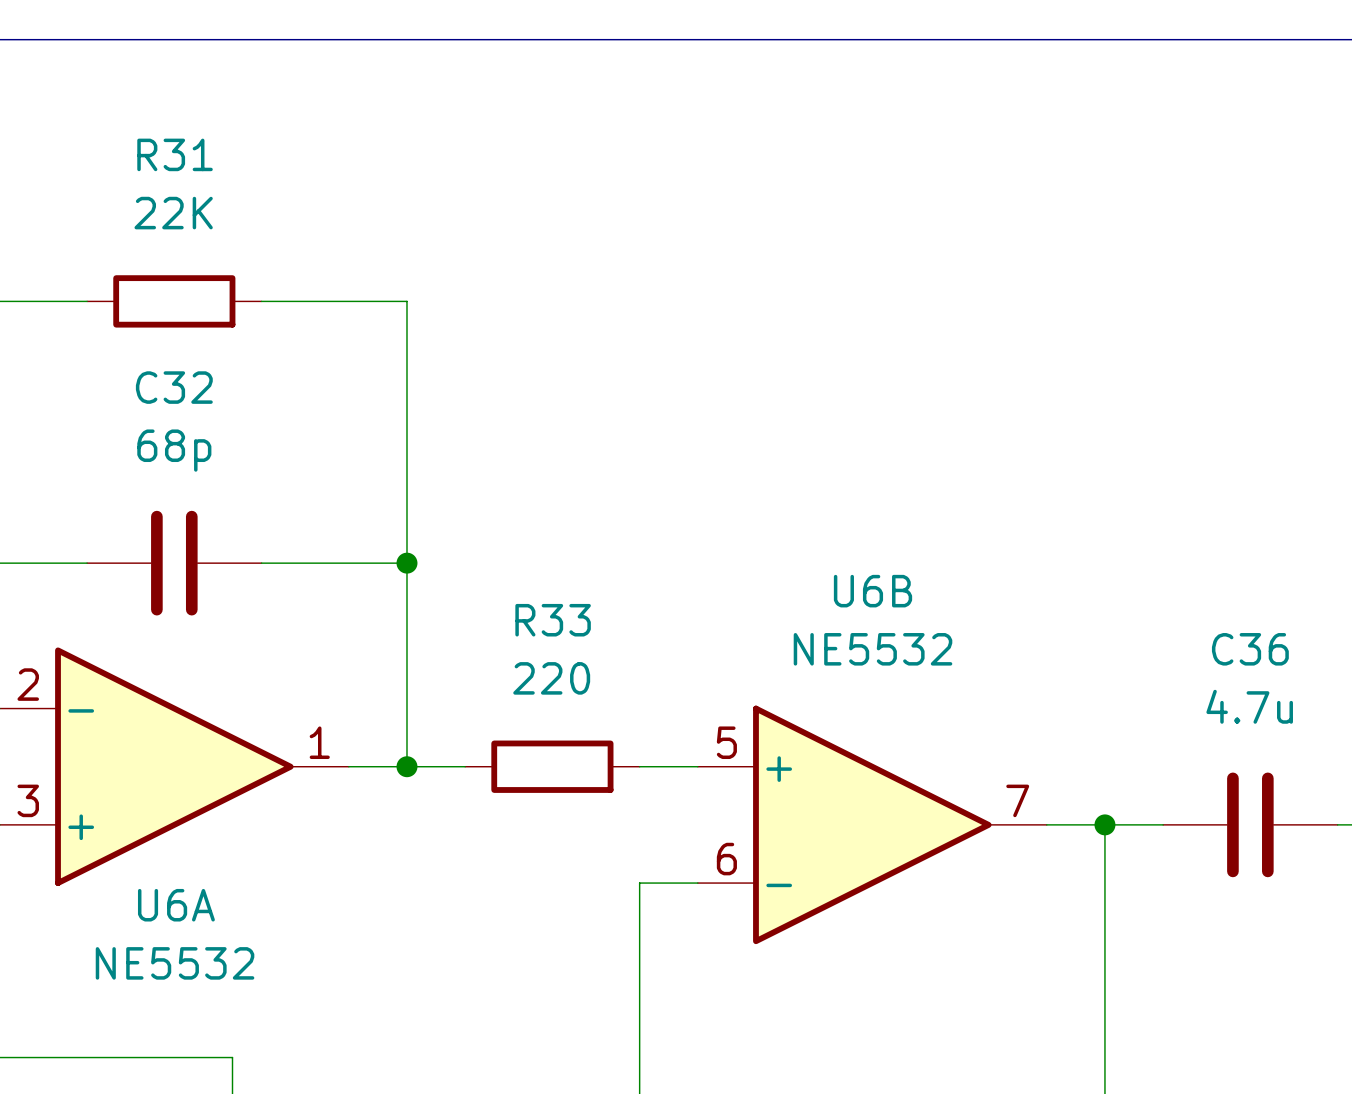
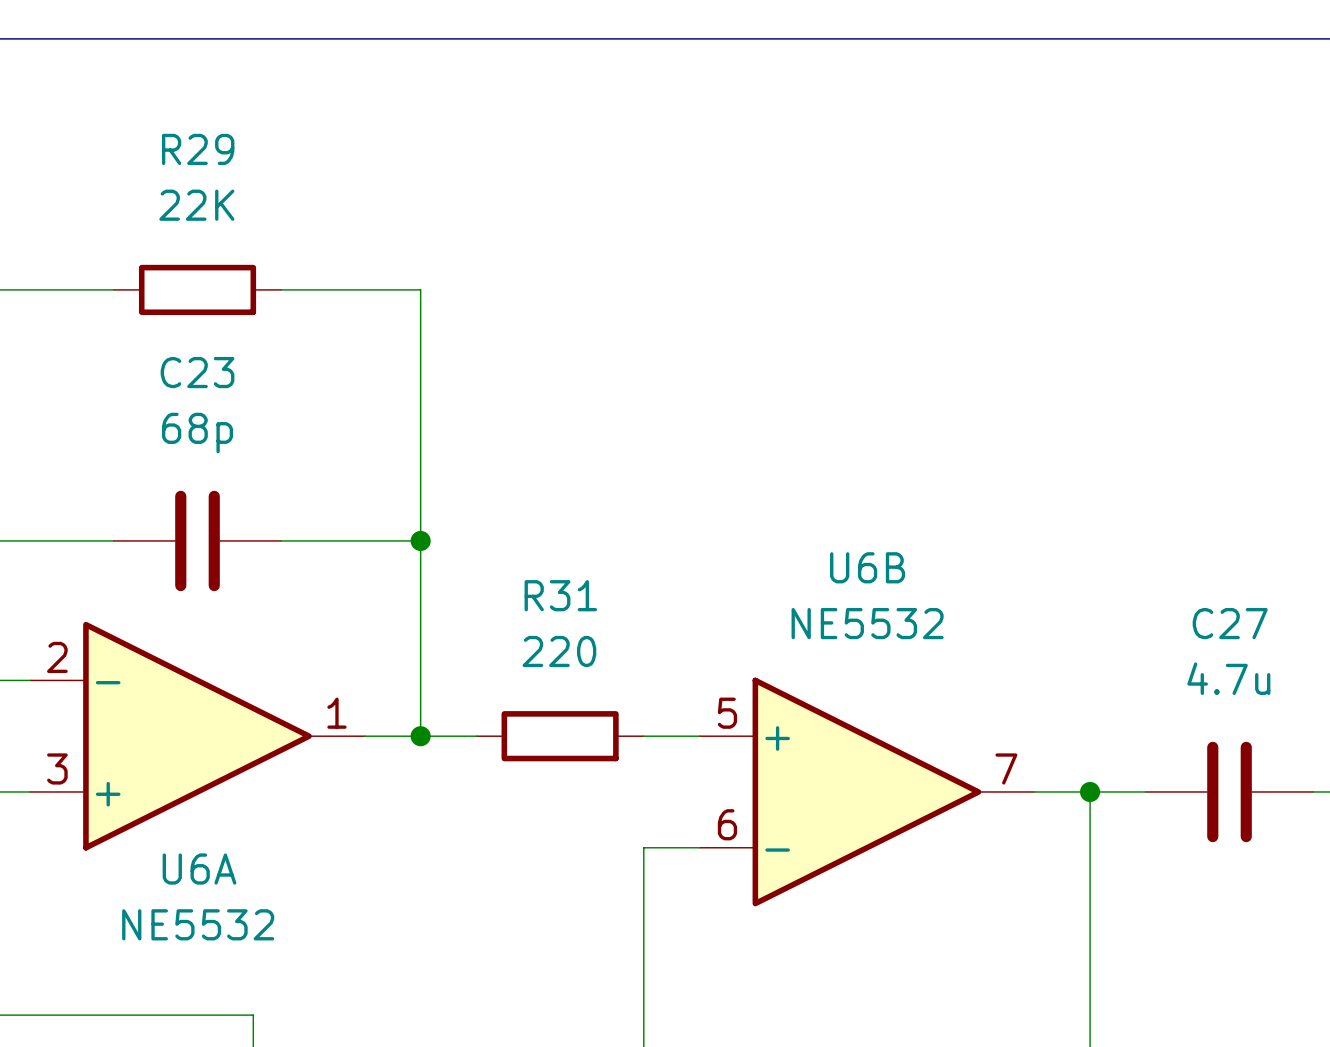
R31 name: R31 (175, 154) -> R29 (198, 149)
C32 name: C32 (174, 387) -> C23 (197, 372)
R33 name: R33 (553, 620) -> R31 (560, 595)
C36 name: C36 (1250, 649) -> C27 (1230, 623)

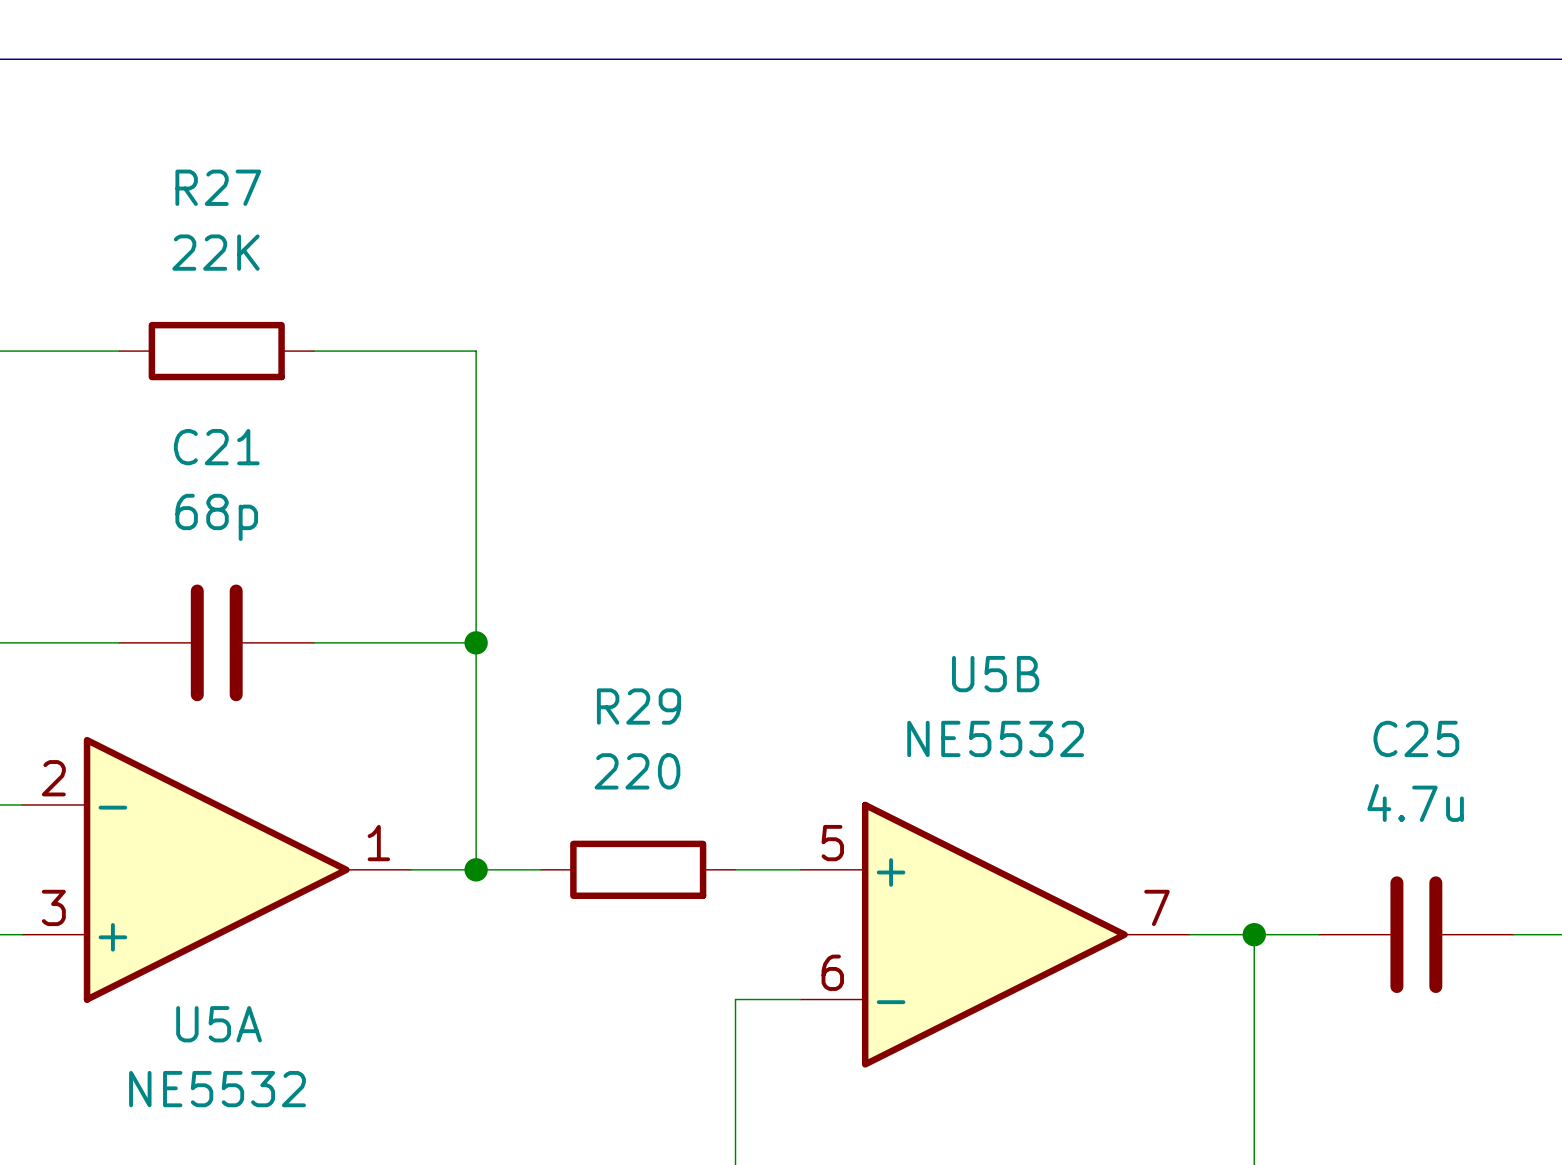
R29 name: R29 (198, 149) -> R27 (218, 187)
C23 name: C23 (197, 372) -> C21 (216, 447)
U6B name: U6B (867, 567) -> U5B (995, 674)
R31 name: R31 (560, 595) -> R29 (639, 706)
C27 name: C27 (1230, 623) -> C25 (1416, 738)
U6A name: U6A (199, 869) -> U5A (219, 1024)

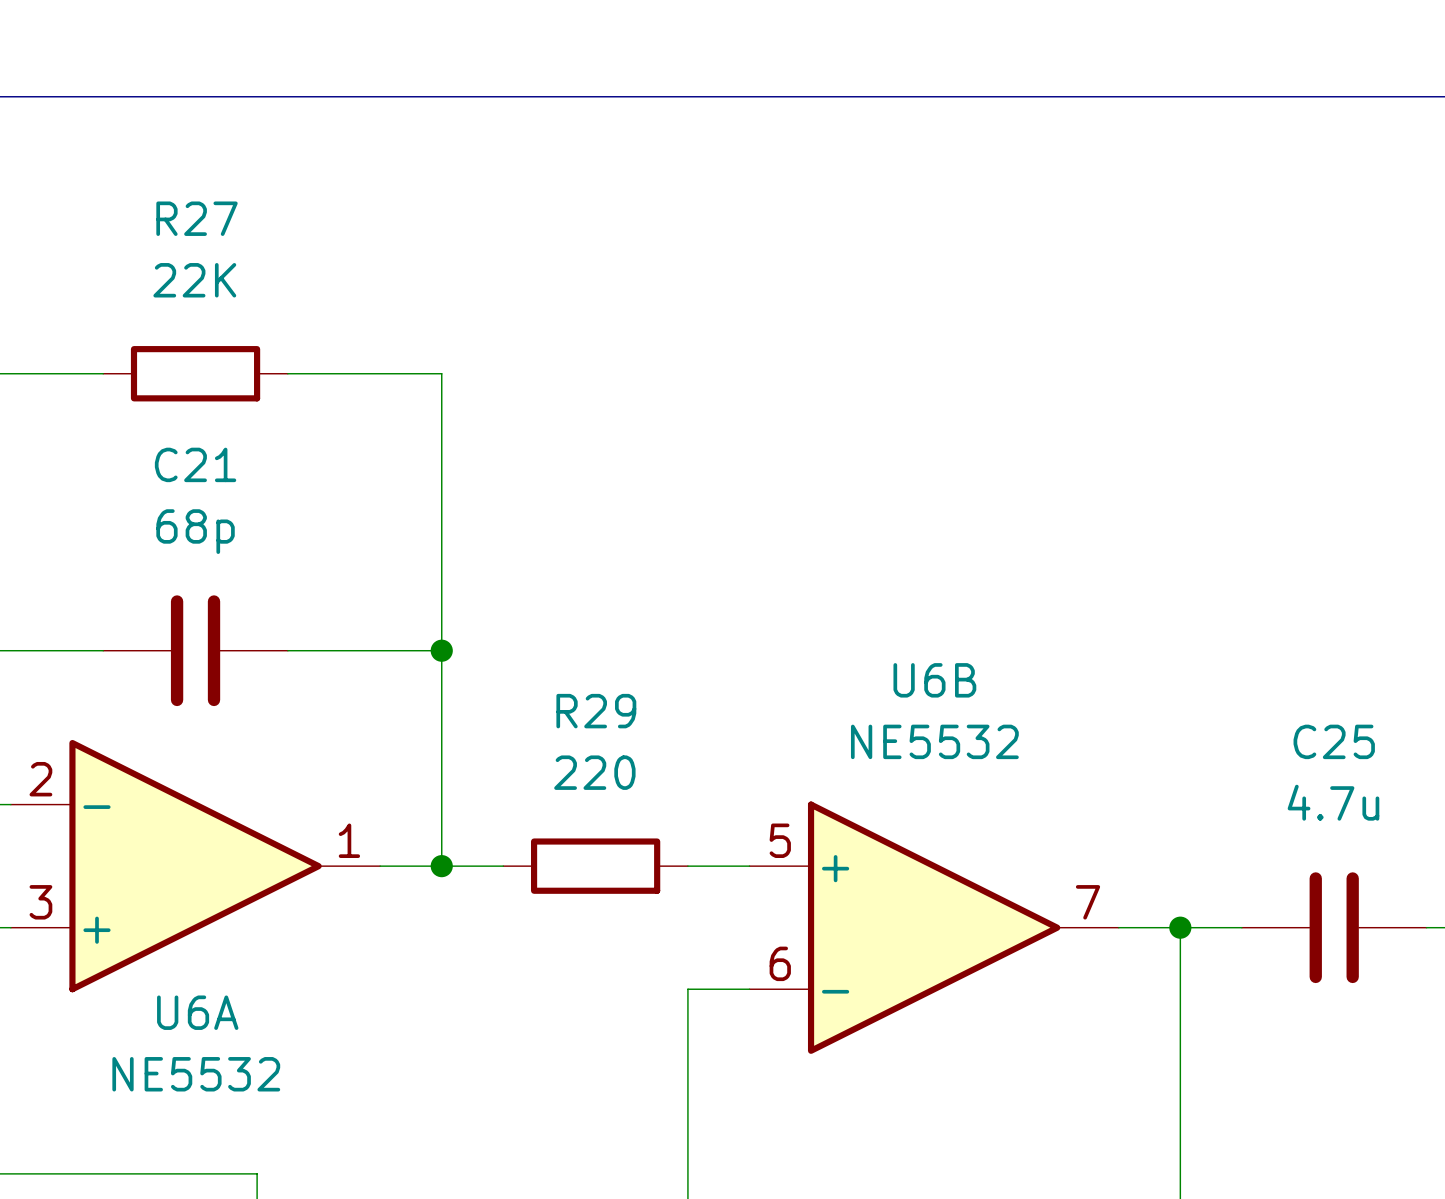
U5B name: U5B (995, 674) -> U6B (934, 680)
U5A name: U5A (219, 1024) -> U6A (197, 1012)

